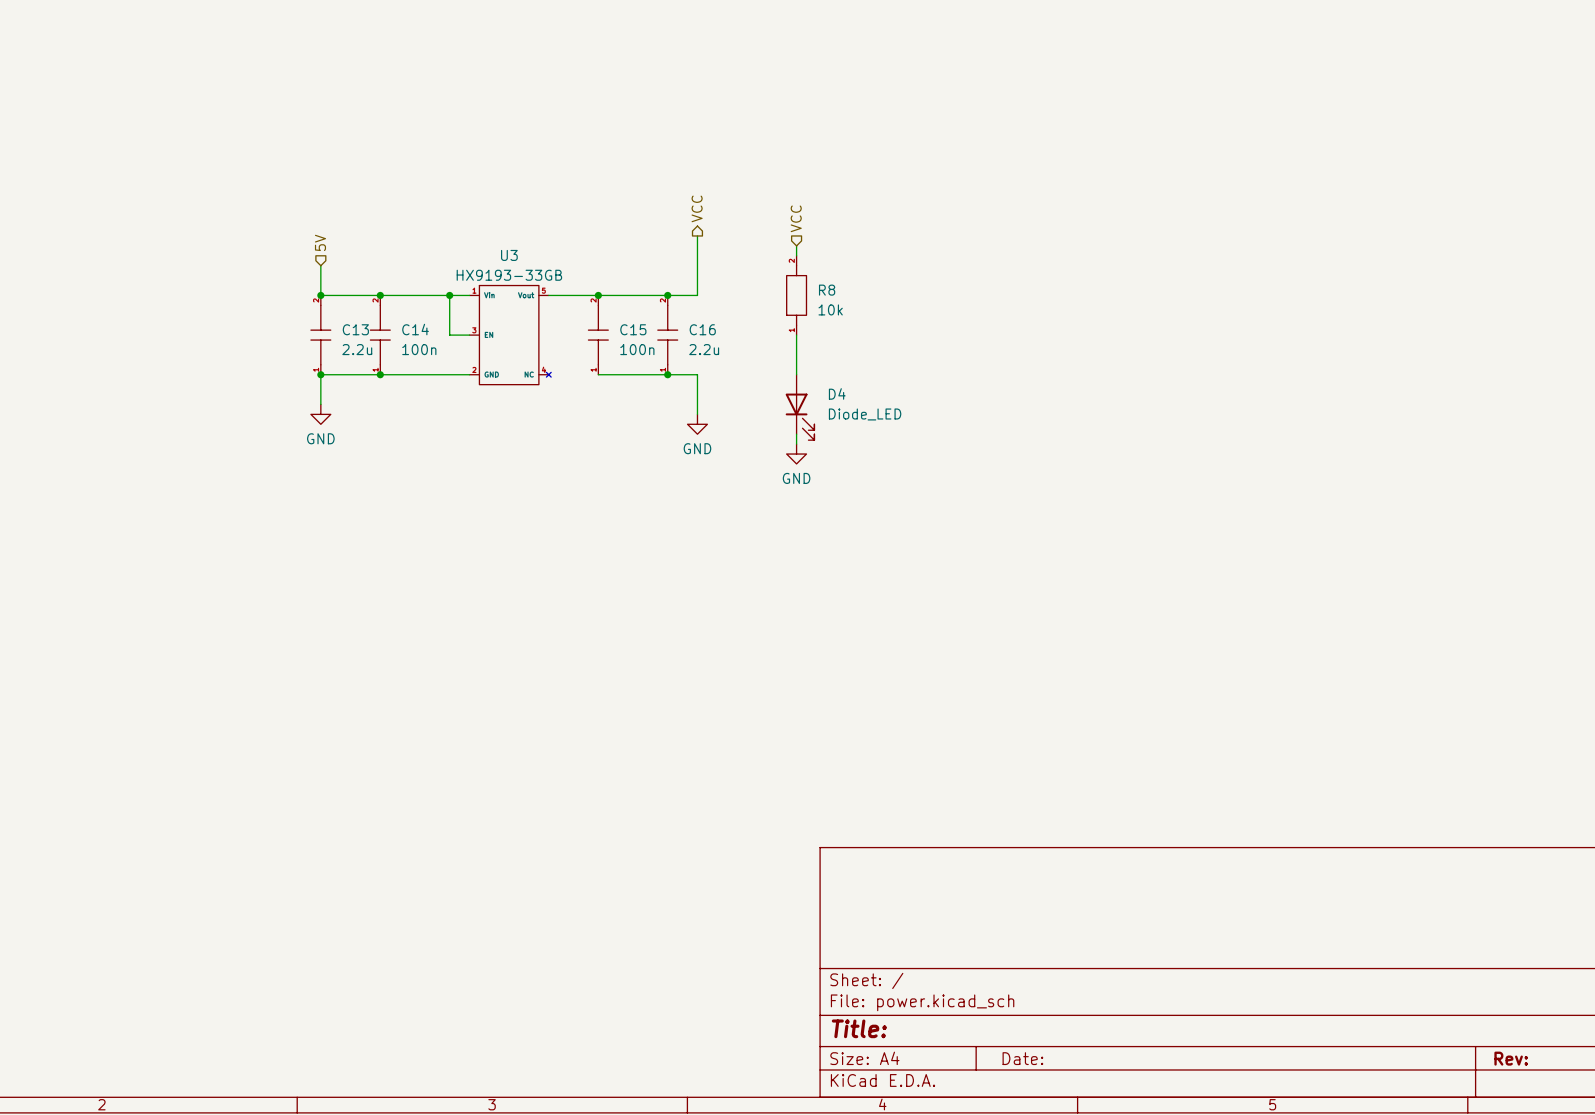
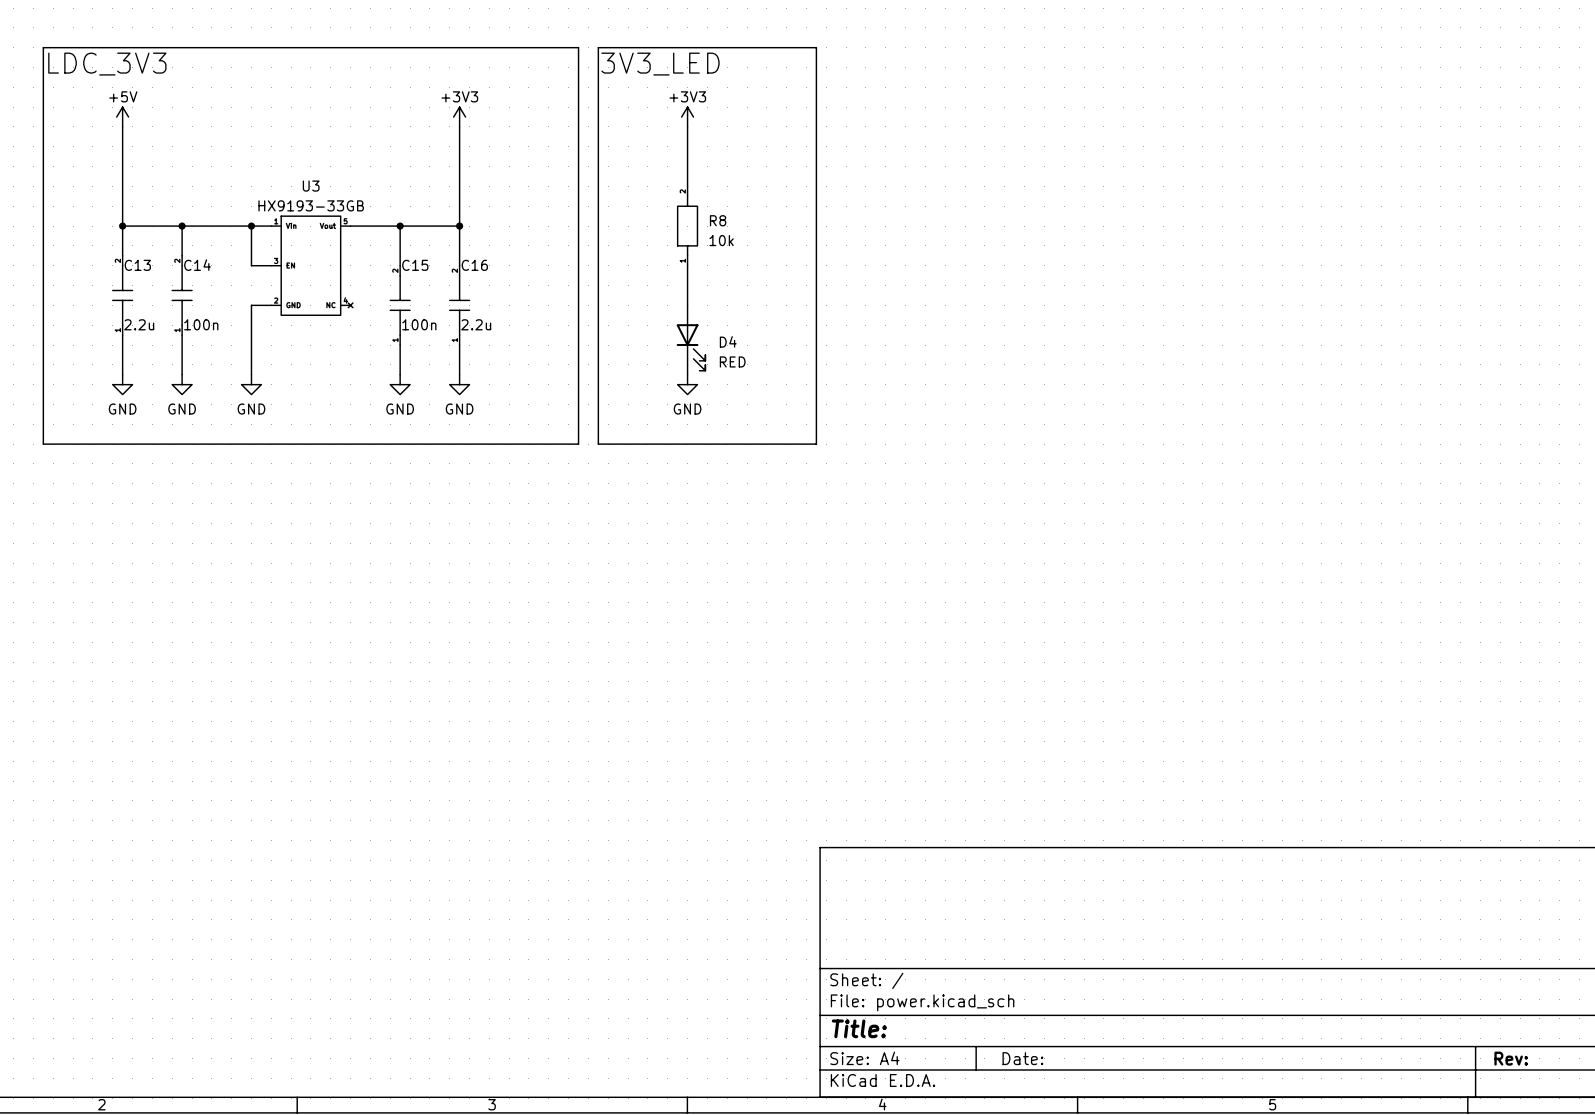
line: none -> (43, 47) (43, 444) (578, 444) (578, 47) (43, 47)
line: none -> (598, 47) (816, 47) (816, 444) (598, 444) (598, 47)
text: none -> LDC_3V3 (107, 64)
text: none -> 3V3_LED (660, 64)
power symbol: none -> +5V (122, 117)
power symbol: none -> +3V3 (459, 117)
power symbol: none -> +3V3 (687, 117)
wire: none -> (122, 126) (122, 255)
wire: none -> (459, 126) (459, 265)
wire: none -> (687, 126) (687, 186)
hierarchical label: VCC (697, 208) -> none
hierarchical label: VCC (796, 218) -> none
wire: none -> (122, 226) (271, 226)
junction: none -> (122, 226)
wire: none -> (182, 226) (182, 255)
junction: none -> (182, 226)
wire: none -> (251, 226) (251, 265) (271, 265)
junction: none -> (251, 226)
wire: none -> (350, 226) (459, 226)
wire: none -> (400, 226) (400, 265)
junction: none -> (400, 226)
junction: none -> (459, 226)
wire: (697, 235) (697, 295) (548, 295) -> none
hierarchical label: 5V (320, 242) -> none
wire: (796, 245) (796, 255) -> none
wire: (320, 265) (320, 295) (469, 295) -> none
junction: (320, 295) -> none
junction: (380, 295) -> none
wire: (449, 295) (449, 335) (469, 335) -> none
junction: (449, 295) -> none
junction: (598, 295) -> none
junction: (667, 295) -> none
R8 position: (796, 295) -> (687, 226)
wire: none -> (271, 305) (251, 305) (251, 374)
C13 name position: C13 (355, 329) -> C13 (137, 265)
C14 name position: C14 (415, 329) -> C14 (197, 265)
C15 name position: C15 (633, 329) -> C15 (415, 265)
C16 name position: C16 (702, 329) -> C16 (474, 265)
wire: none -> (122, 335) (122, 374)
wire: none -> (182, 335) (182, 374)
C13 position: (320, 335) -> (122, 295)
C14 position: (380, 335) -> (182, 295)
U3 position: (510, 335) -> (312, 265)
C15 position: (598, 335) -> (400, 305)
C16 position: (667, 335) -> (459, 305)
wire: (796, 335) (796, 374) -> (687, 265) (687, 305)
wire: none -> (400, 345) (400, 374)
wire: none -> (459, 345) (459, 374)
C13 value position: 2.2u (357, 349) -> 2.2u (139, 324)
C14 value position: 100n (419, 349) -> 100n (201, 324)
C15 value position: 100n (637, 349) -> 100n (419, 324)
C16 value position: 2.2u (704, 349) -> 2.2u (476, 324)
junction: (320, 374) -> none
junction: (380, 374) -> none
wire: (469, 374) (320, 374) (320, 404) -> none
wire: (598, 374) (697, 374) (697, 414) -> none
junction: (667, 374) -> none
power symbol: none -> GND (122, 384)
power symbol: none -> GND (182, 384)
power symbol: none -> GND (251, 384)
power symbol: none -> GND (400, 384)
power symbol: none -> GND (459, 384)
D4 name position: D4 (837, 393) -> D4 (728, 341)
D4 position: (800, 407) -> (691, 338)
power symbol: GND (320, 414) -> none
D4 value: Diode_LED (865, 414) -> RED (732, 361)
power symbol position: GND (697, 424) -> GND (687, 384)
wire: (796, 434) (796, 444) -> (687, 364) (687, 374)
power symbol: GND (796, 454) -> none

